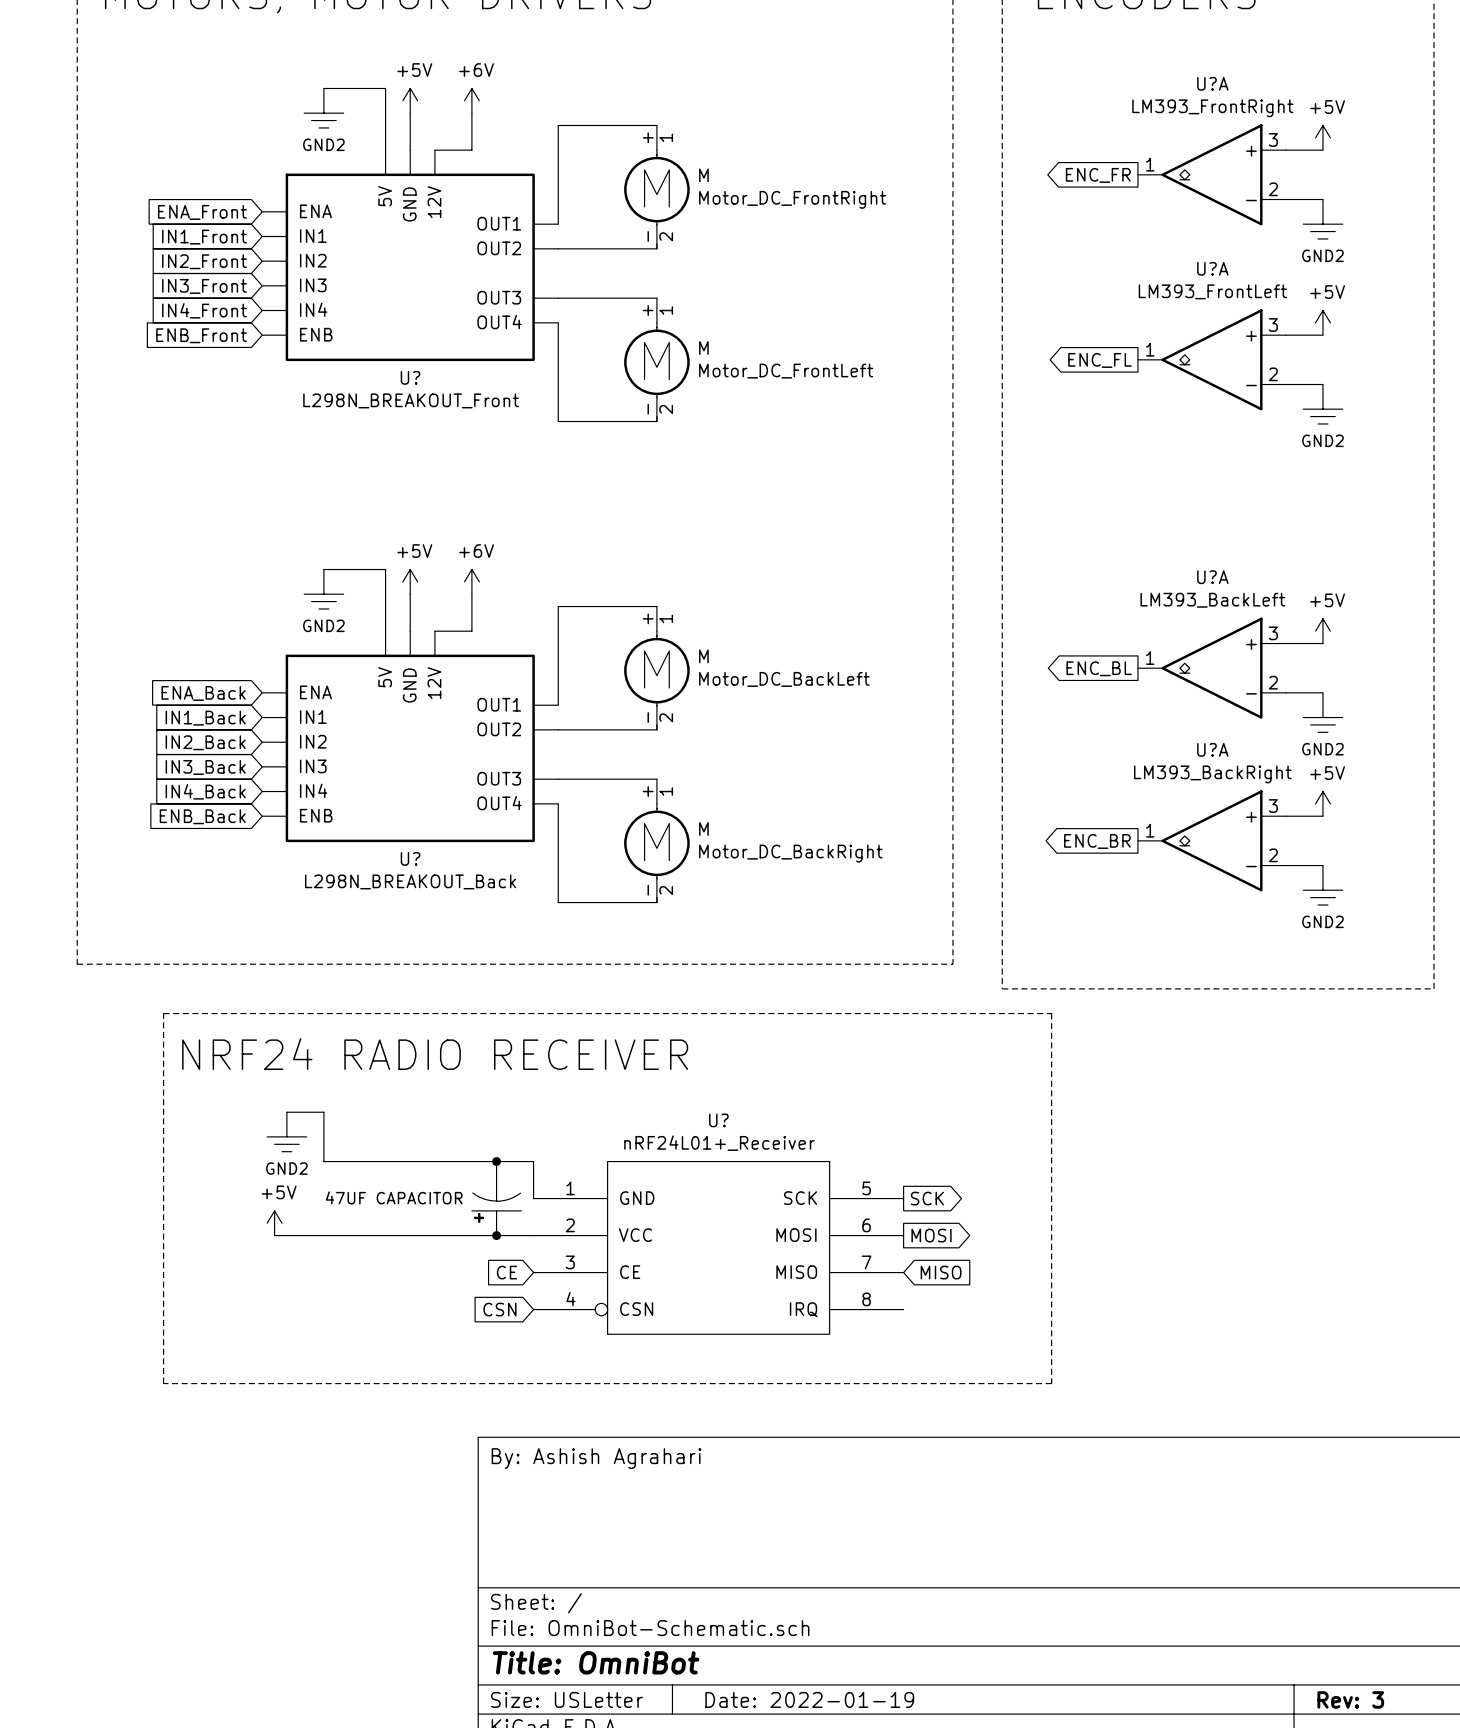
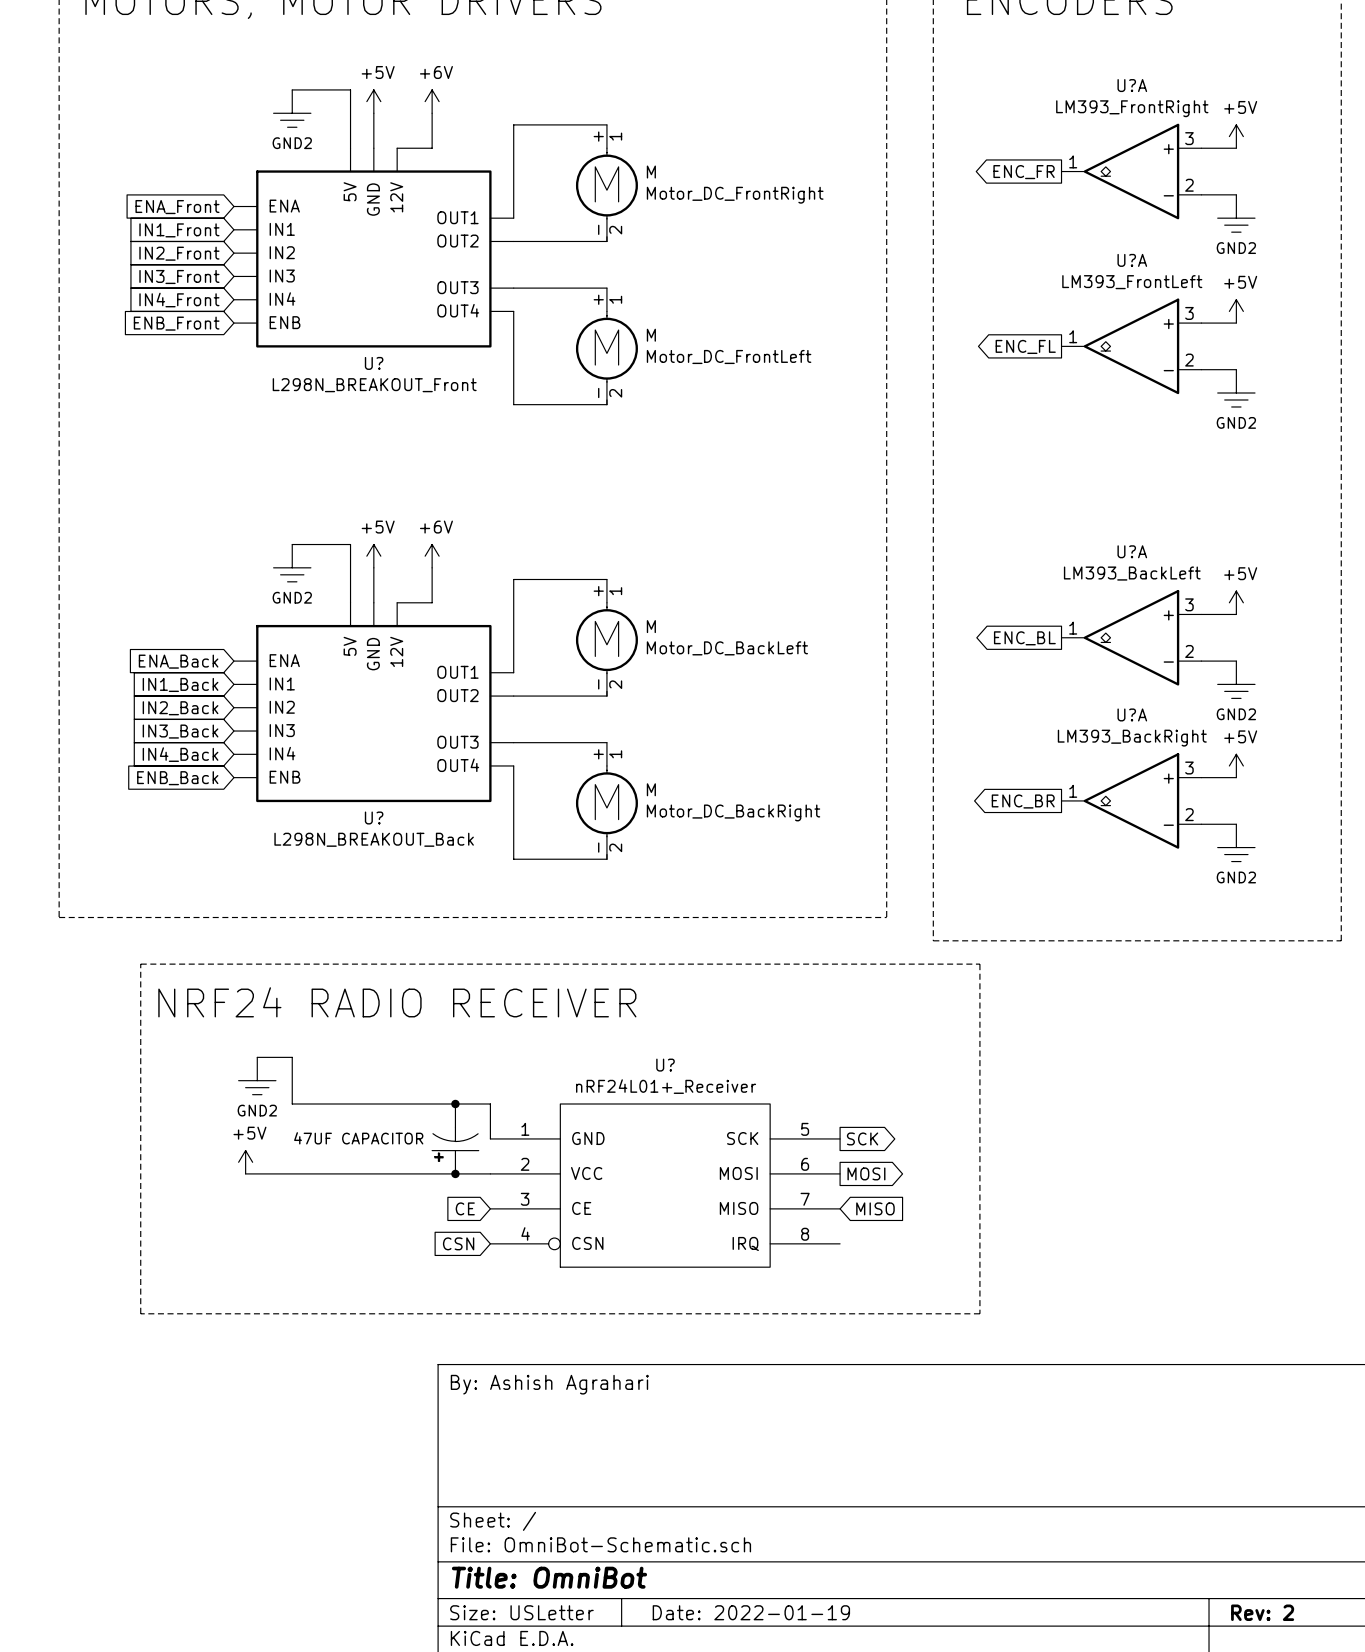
title block: Rev: 3 (1350, 1699) -> Rev: 2 (1262, 1612)

